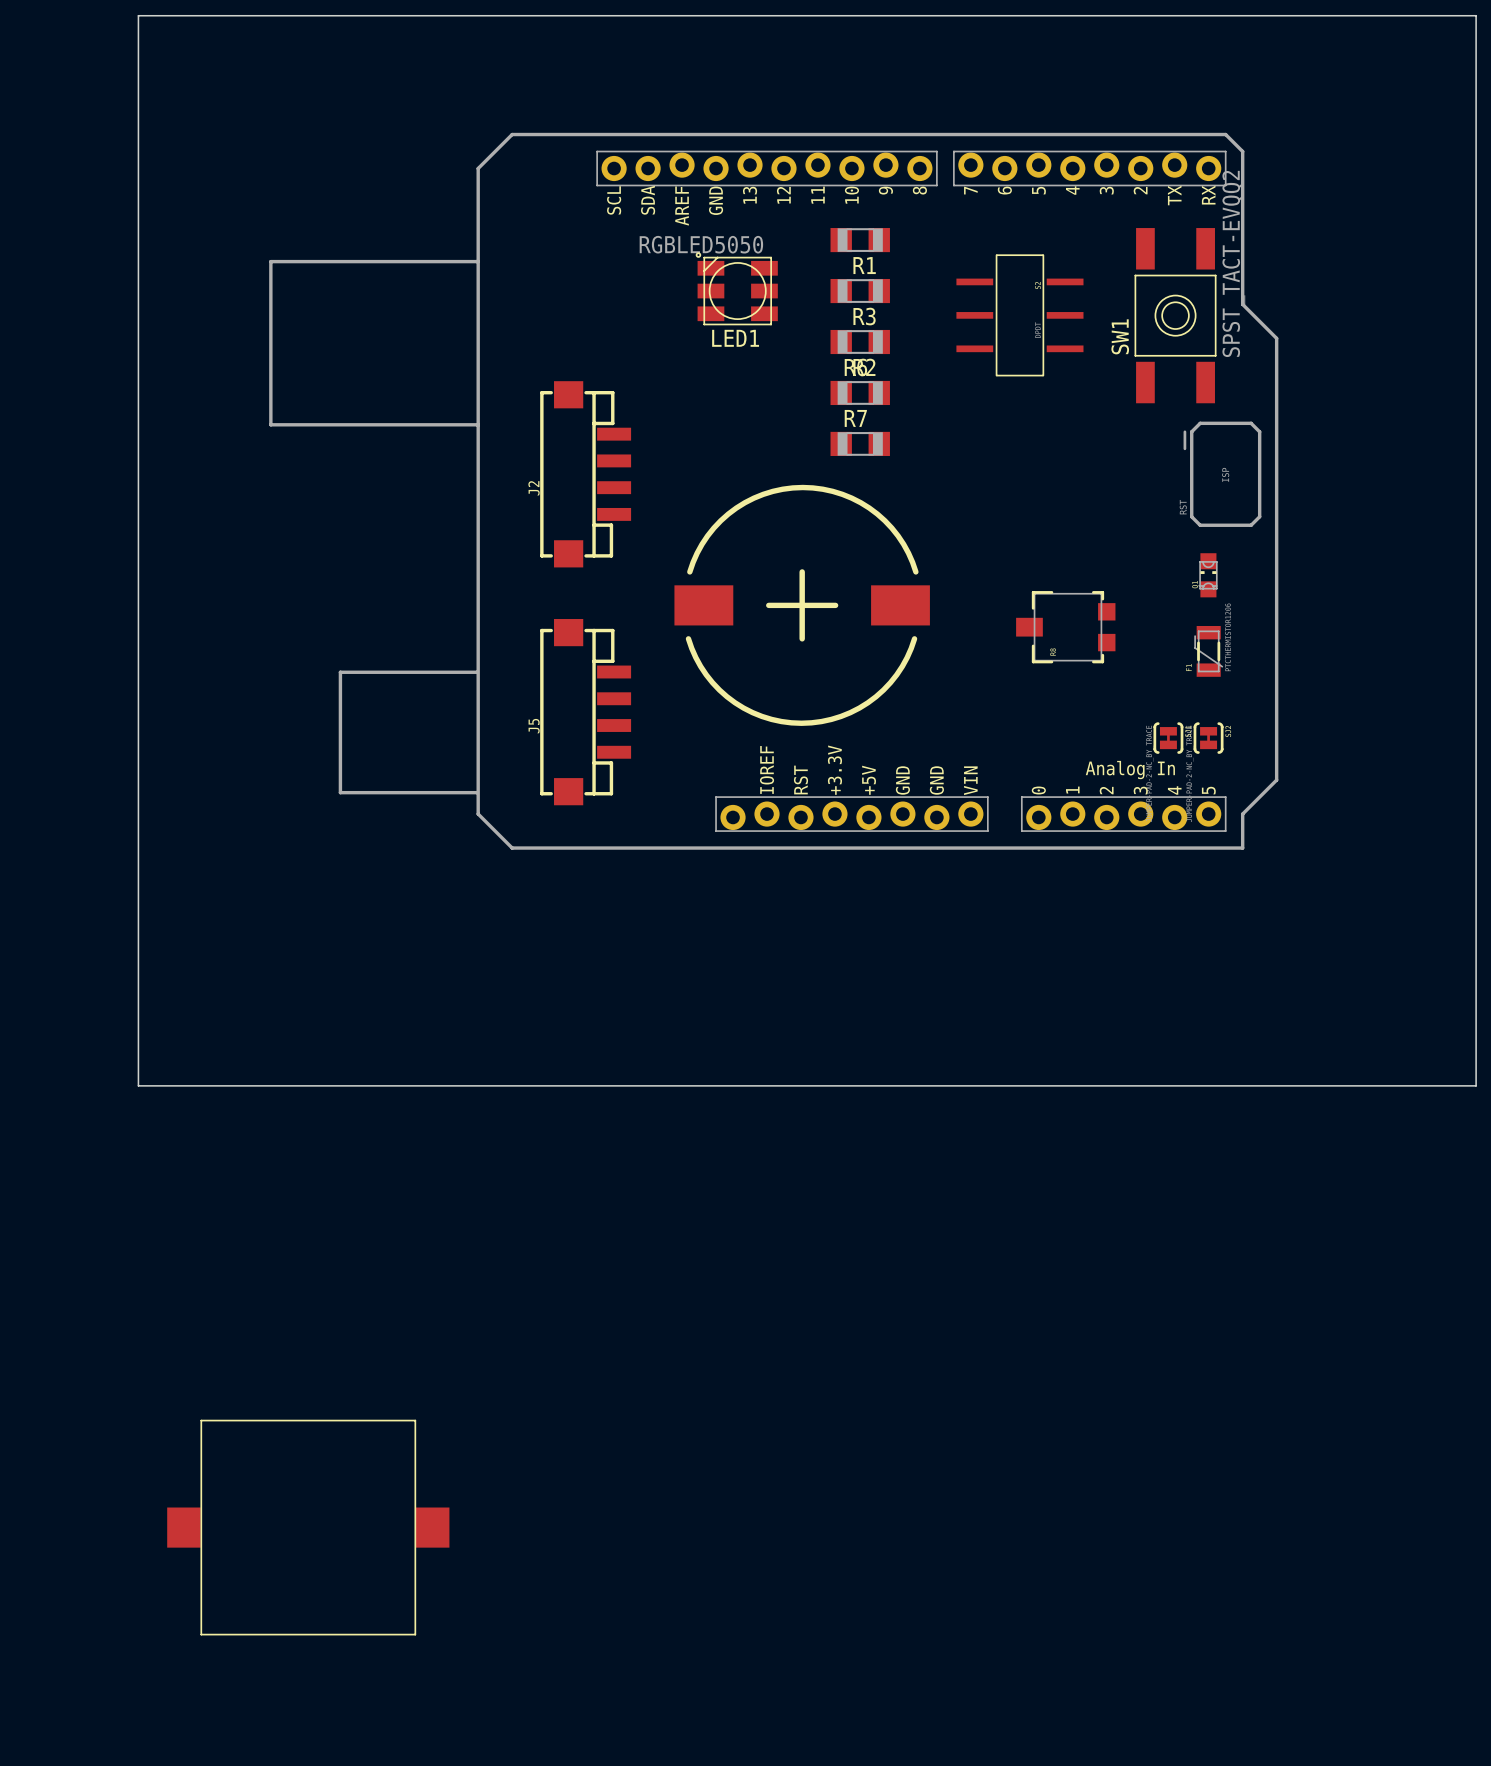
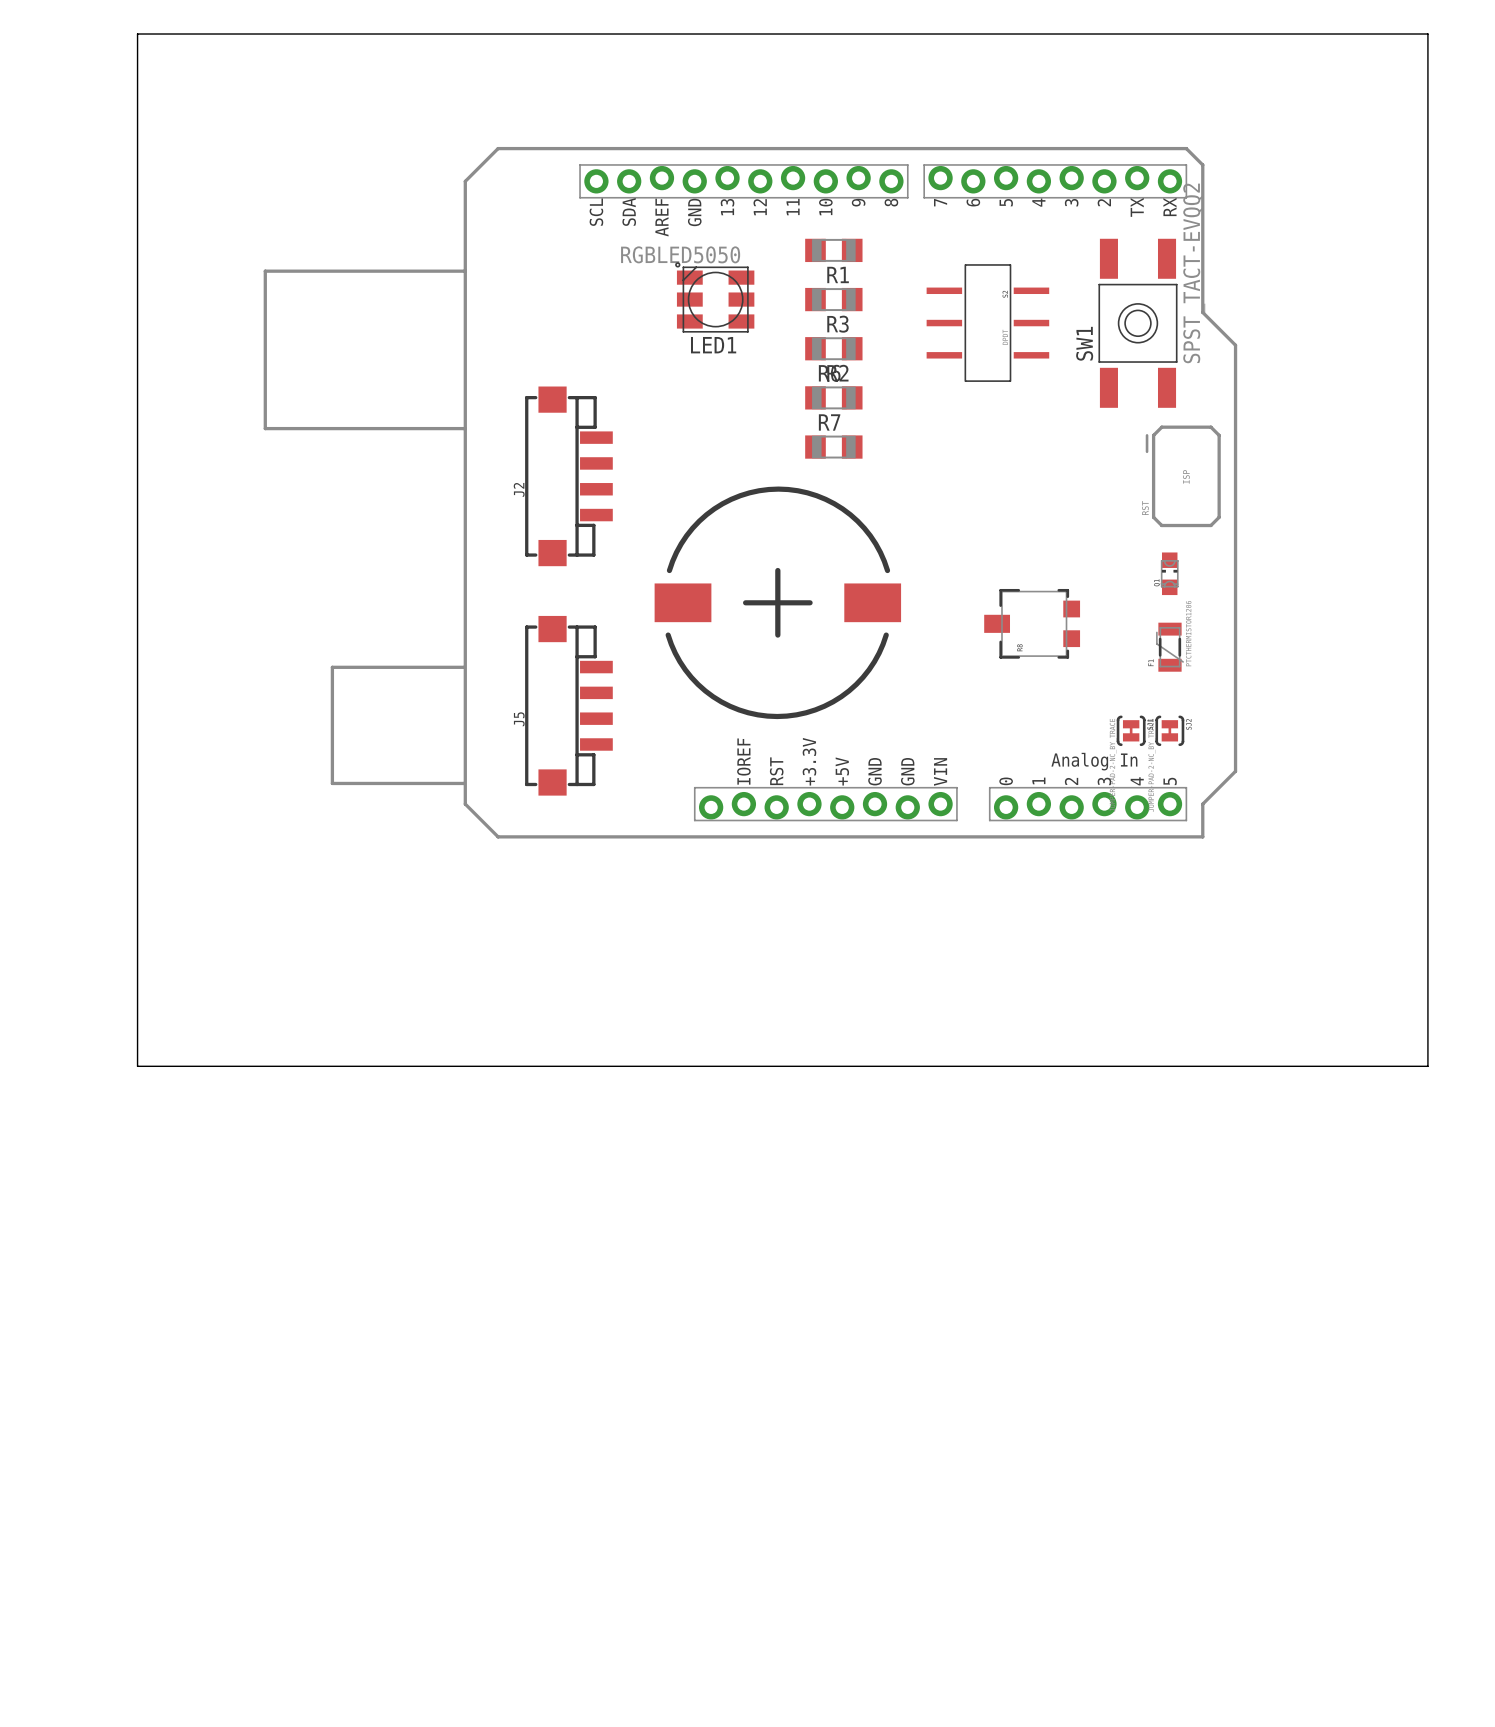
part: (308, 1527) -> none

